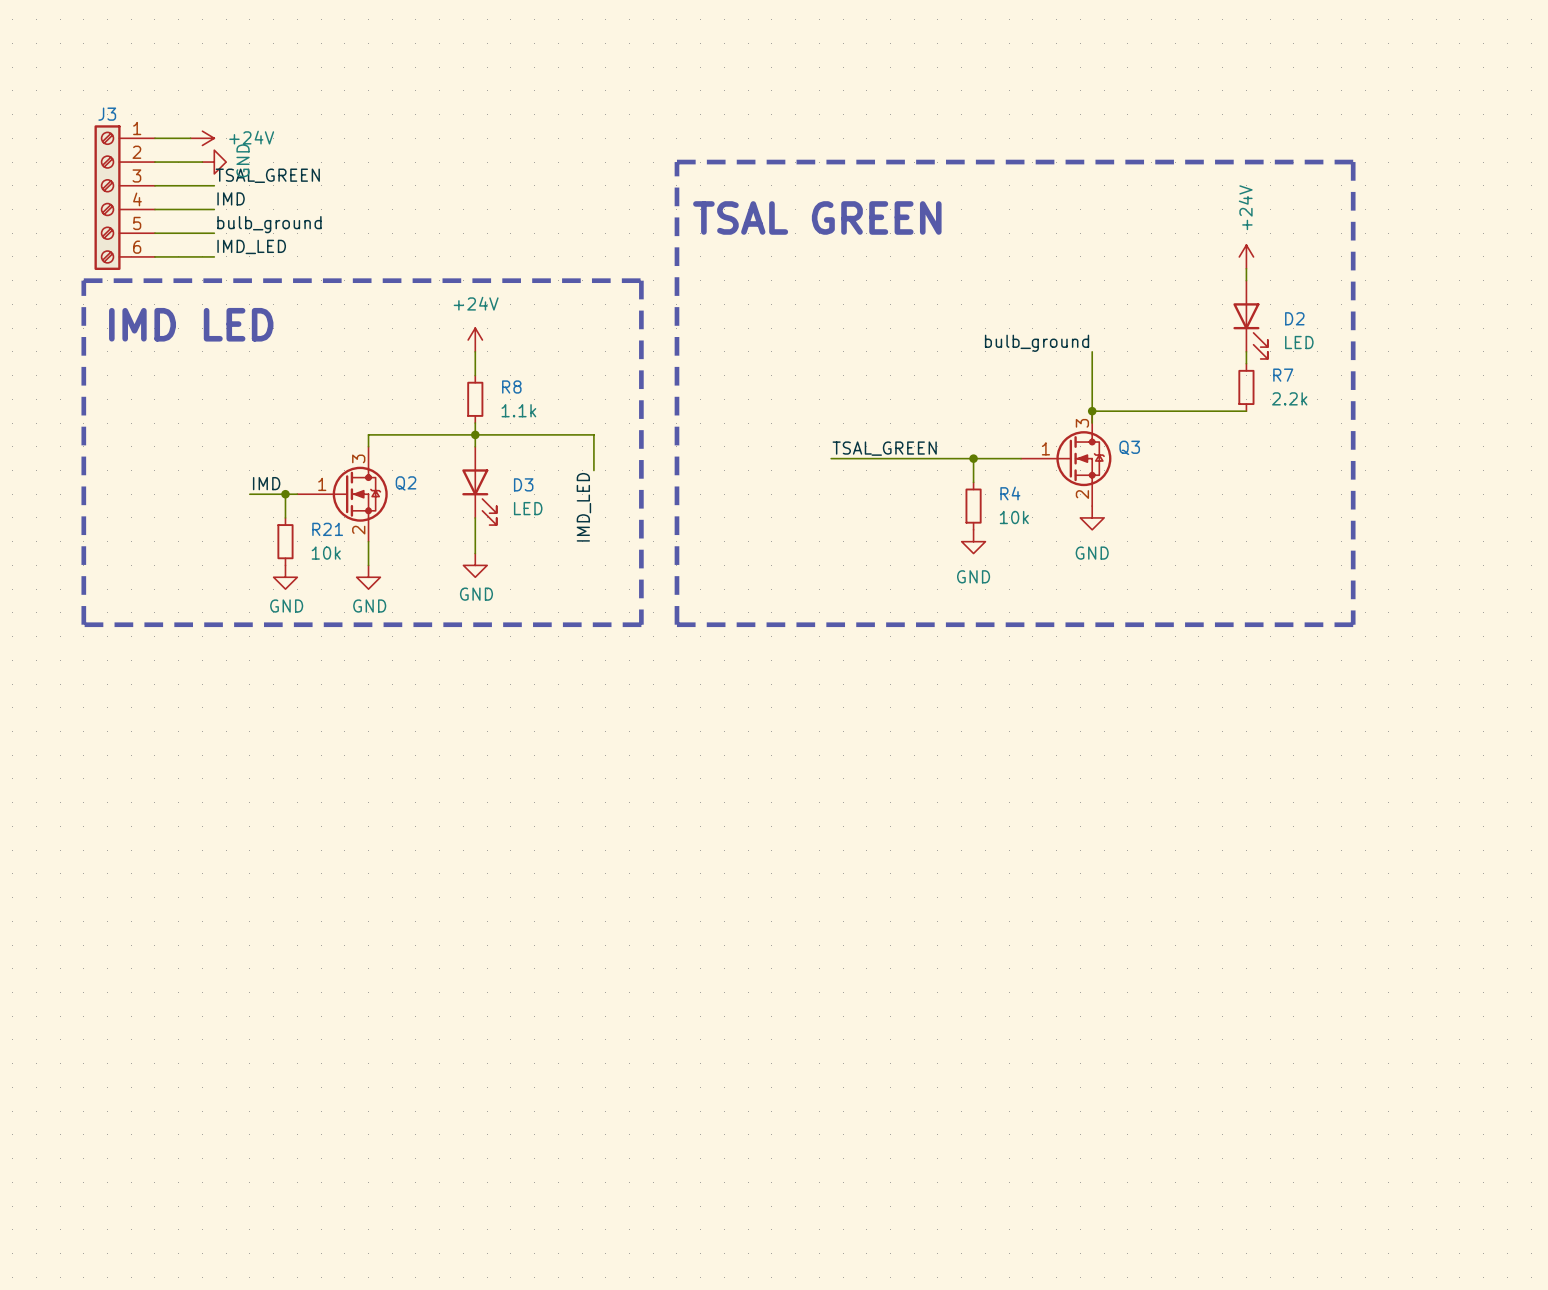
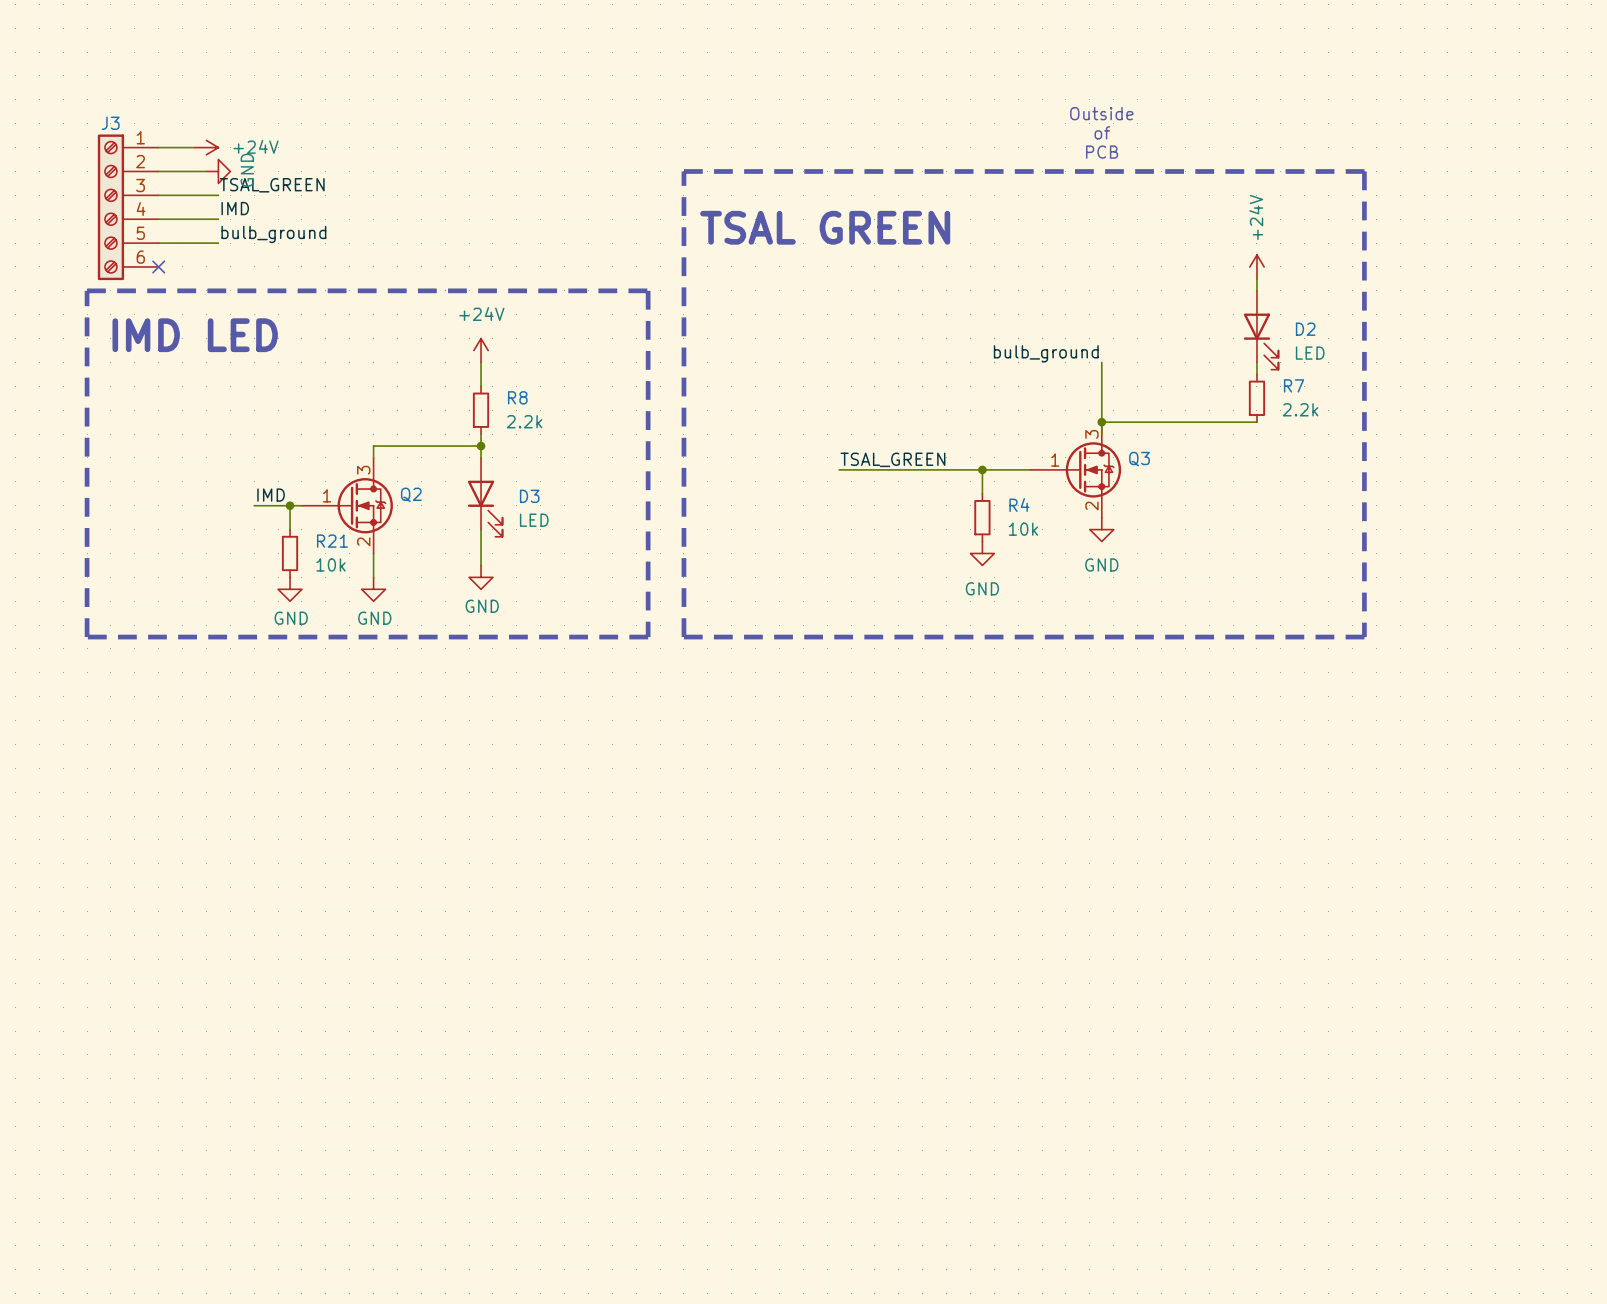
text: none -> Outside (1101, 113)
text: none -> of (1102, 132)
text: none -> PCB (1102, 152)
label: IMD_LED (251, 246) -> none
wire: (154, 256) (214, 256) -> none
no-connect mark: none -> (158, 266)
R8 value: 1.1k (518, 410) -> 2.2k (524, 421)
wire: (475, 434) (593, 434) (593, 470) -> none
label: IMD_LED (583, 507) -> none

